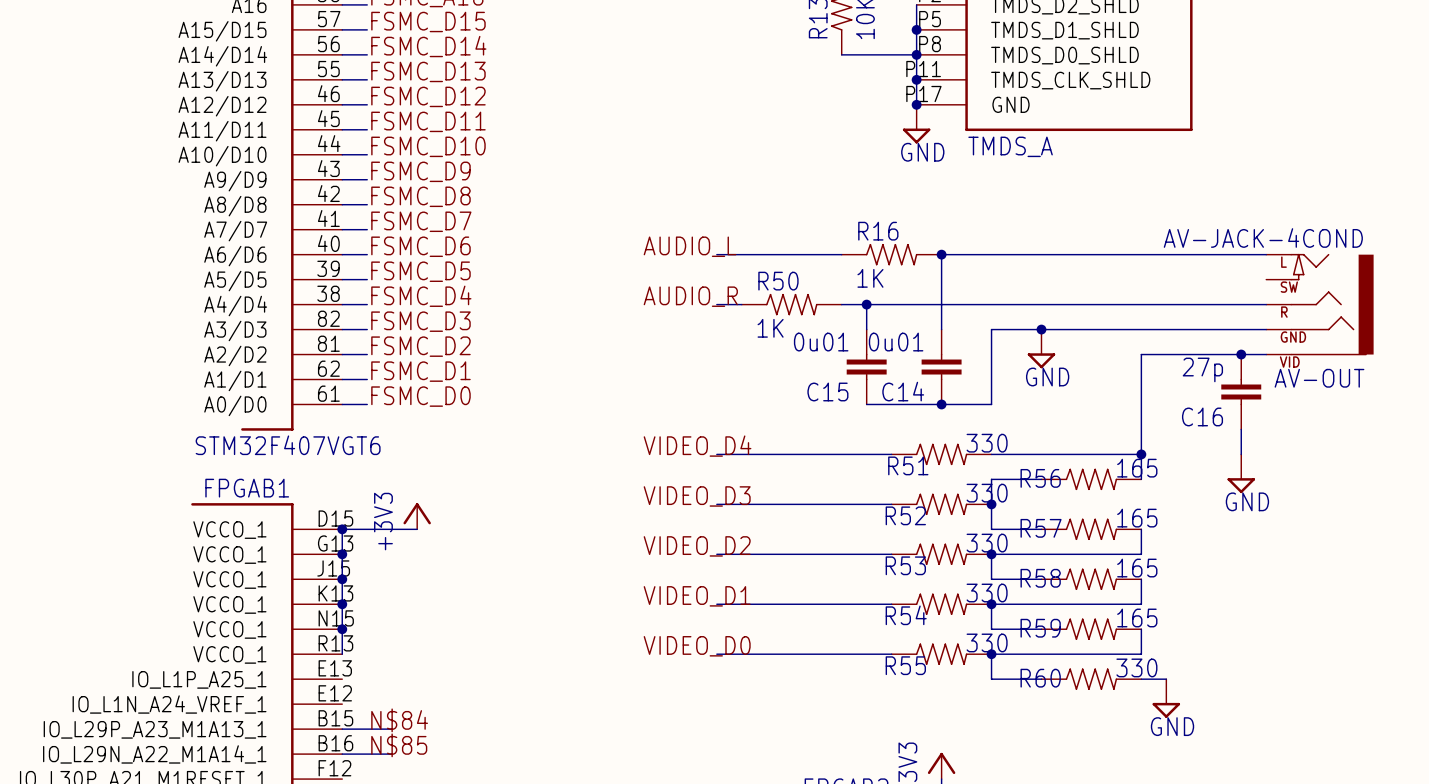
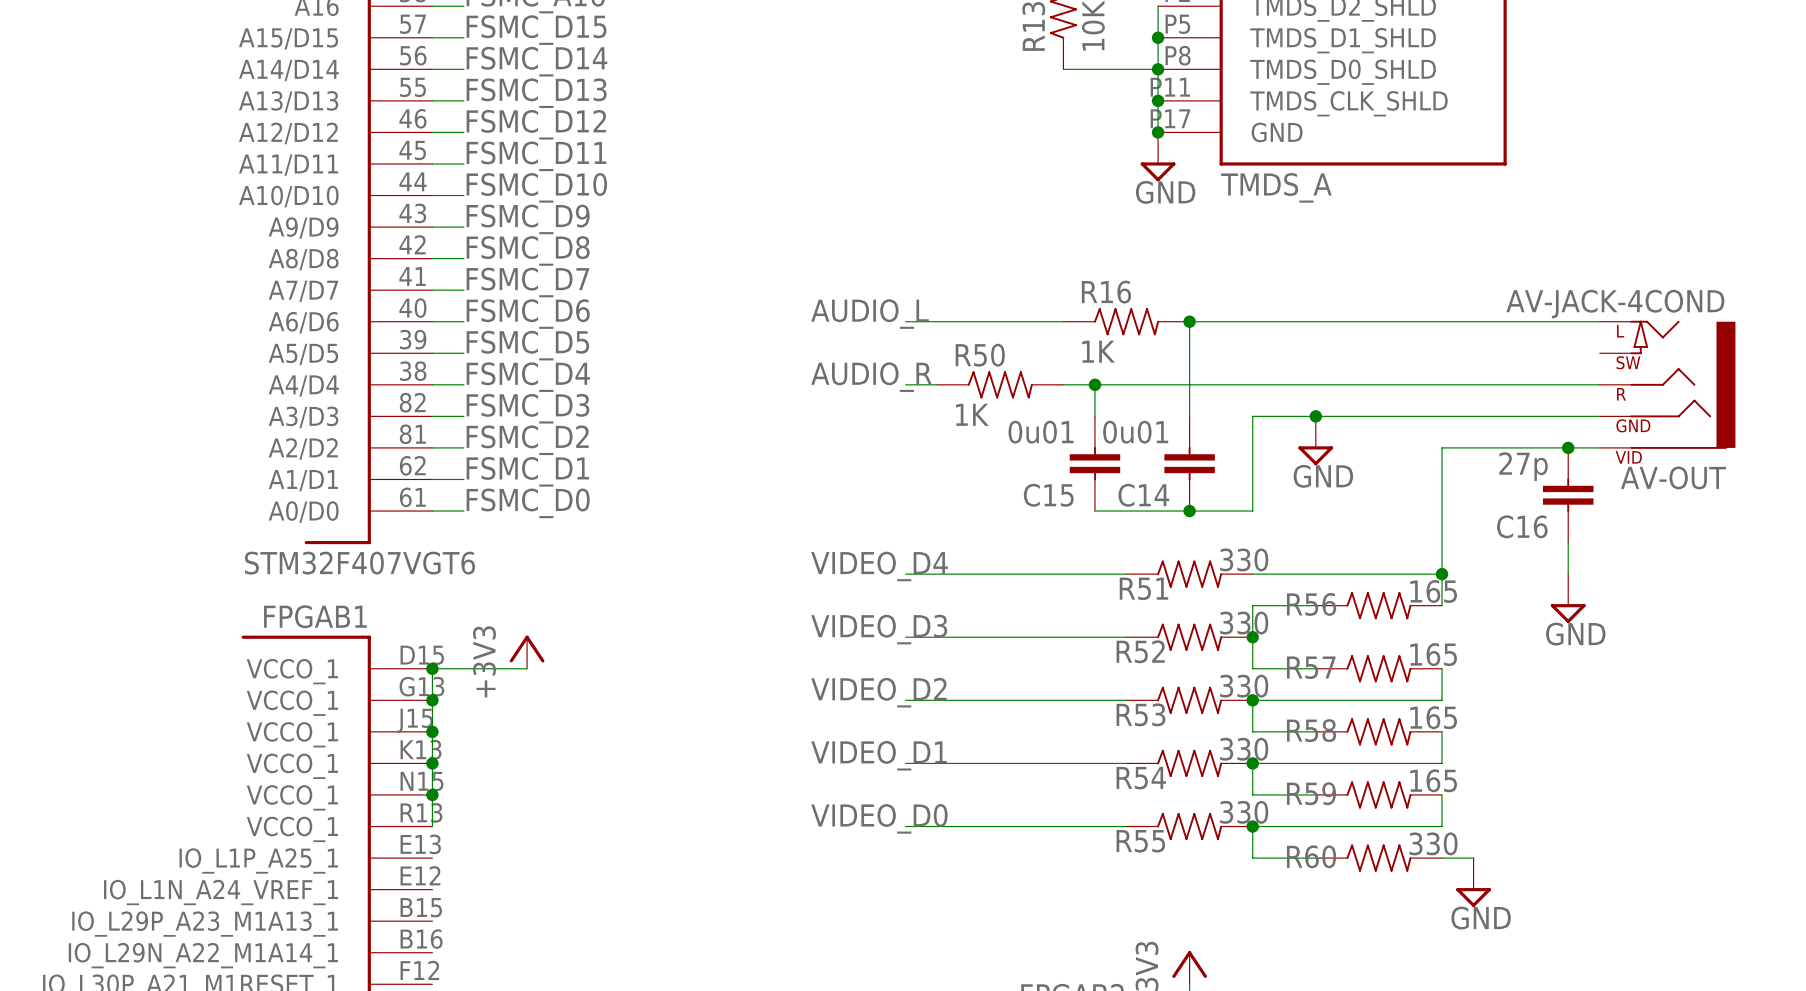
label: N$84 (399, 720) -> none
wire: (342, 729) (392, 729) -> none
label: N$85 (399, 745) -> none
wire: (342, 754) (392, 754) -> none

